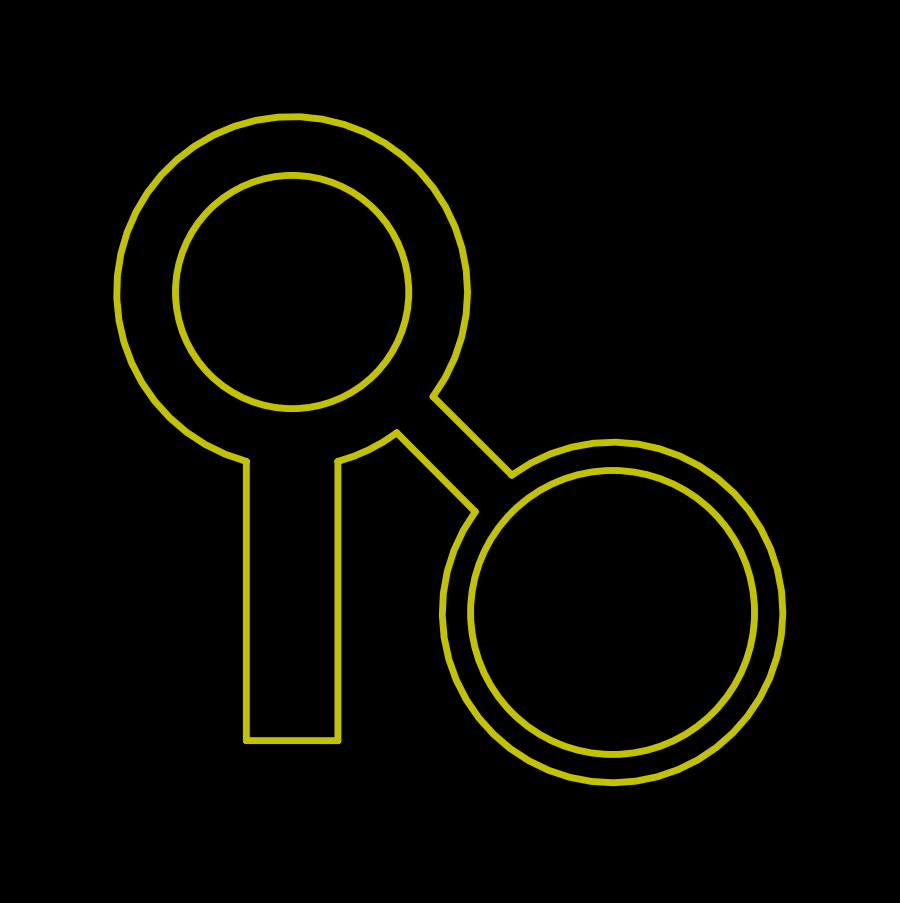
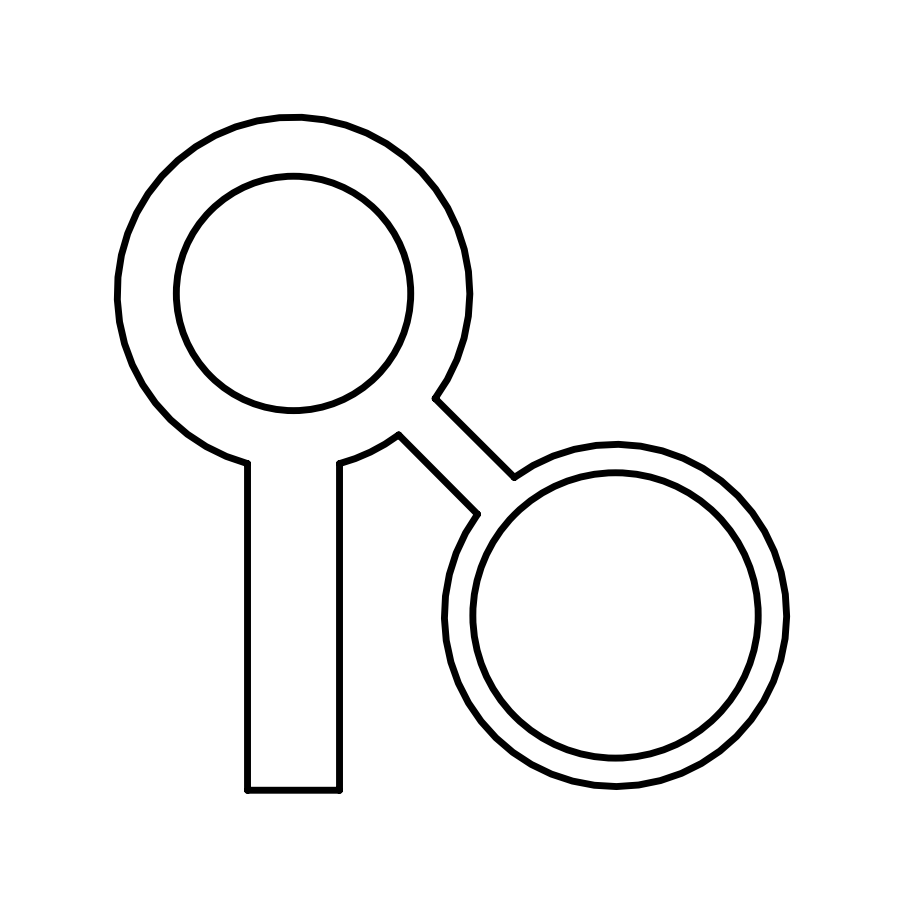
board edge: (337, 740) (246, 740) -> (339, 744) (339, 790) (247, 790) (247, 744)

